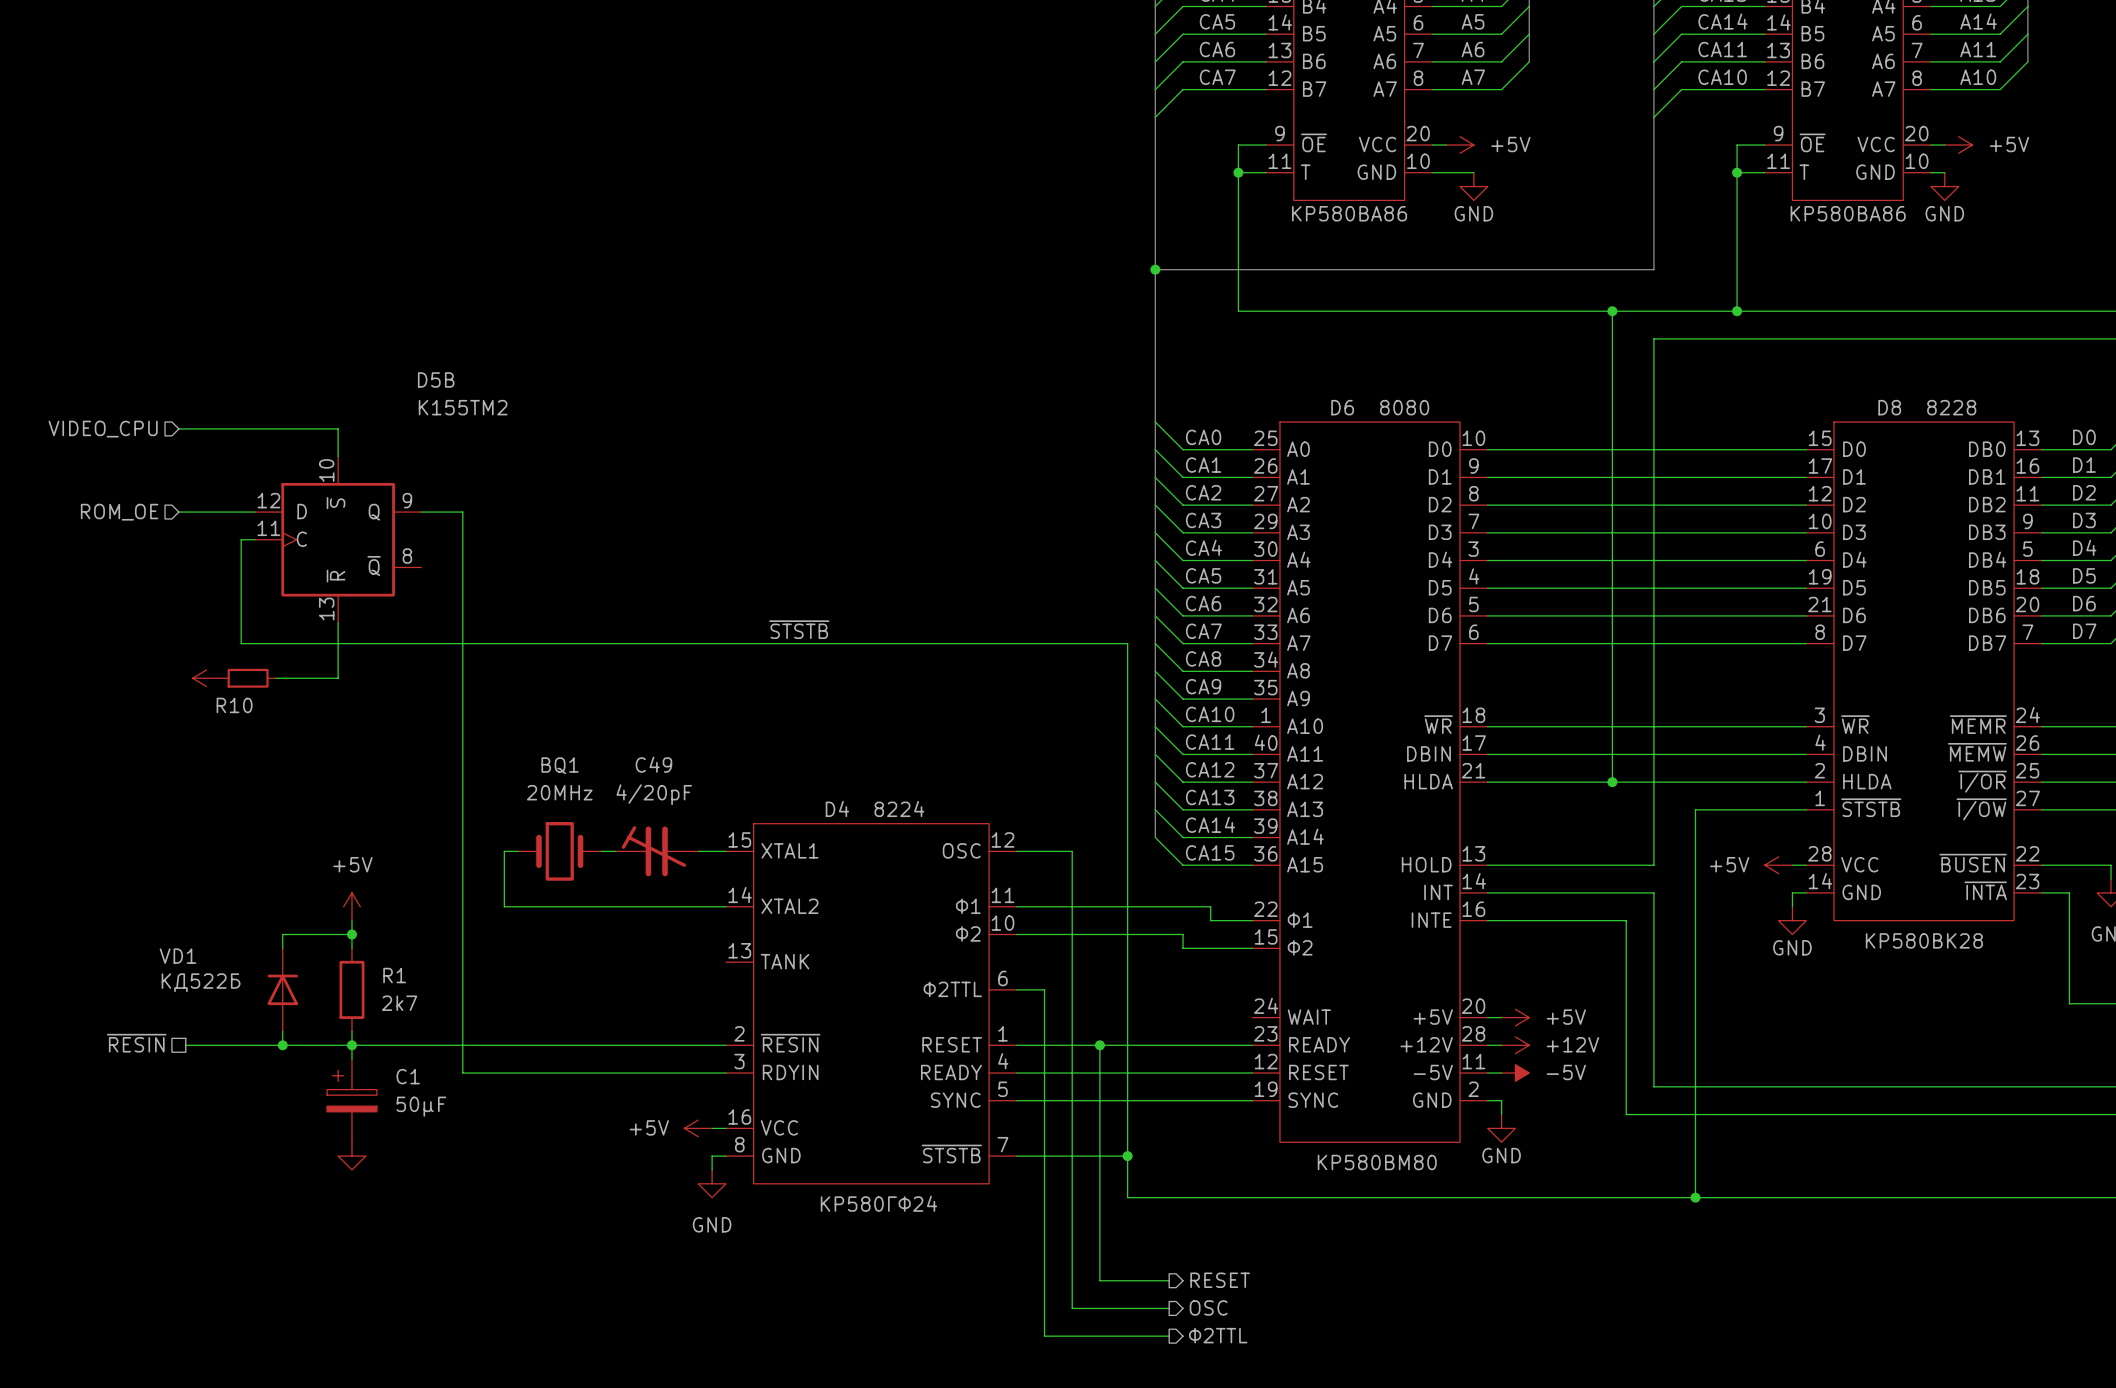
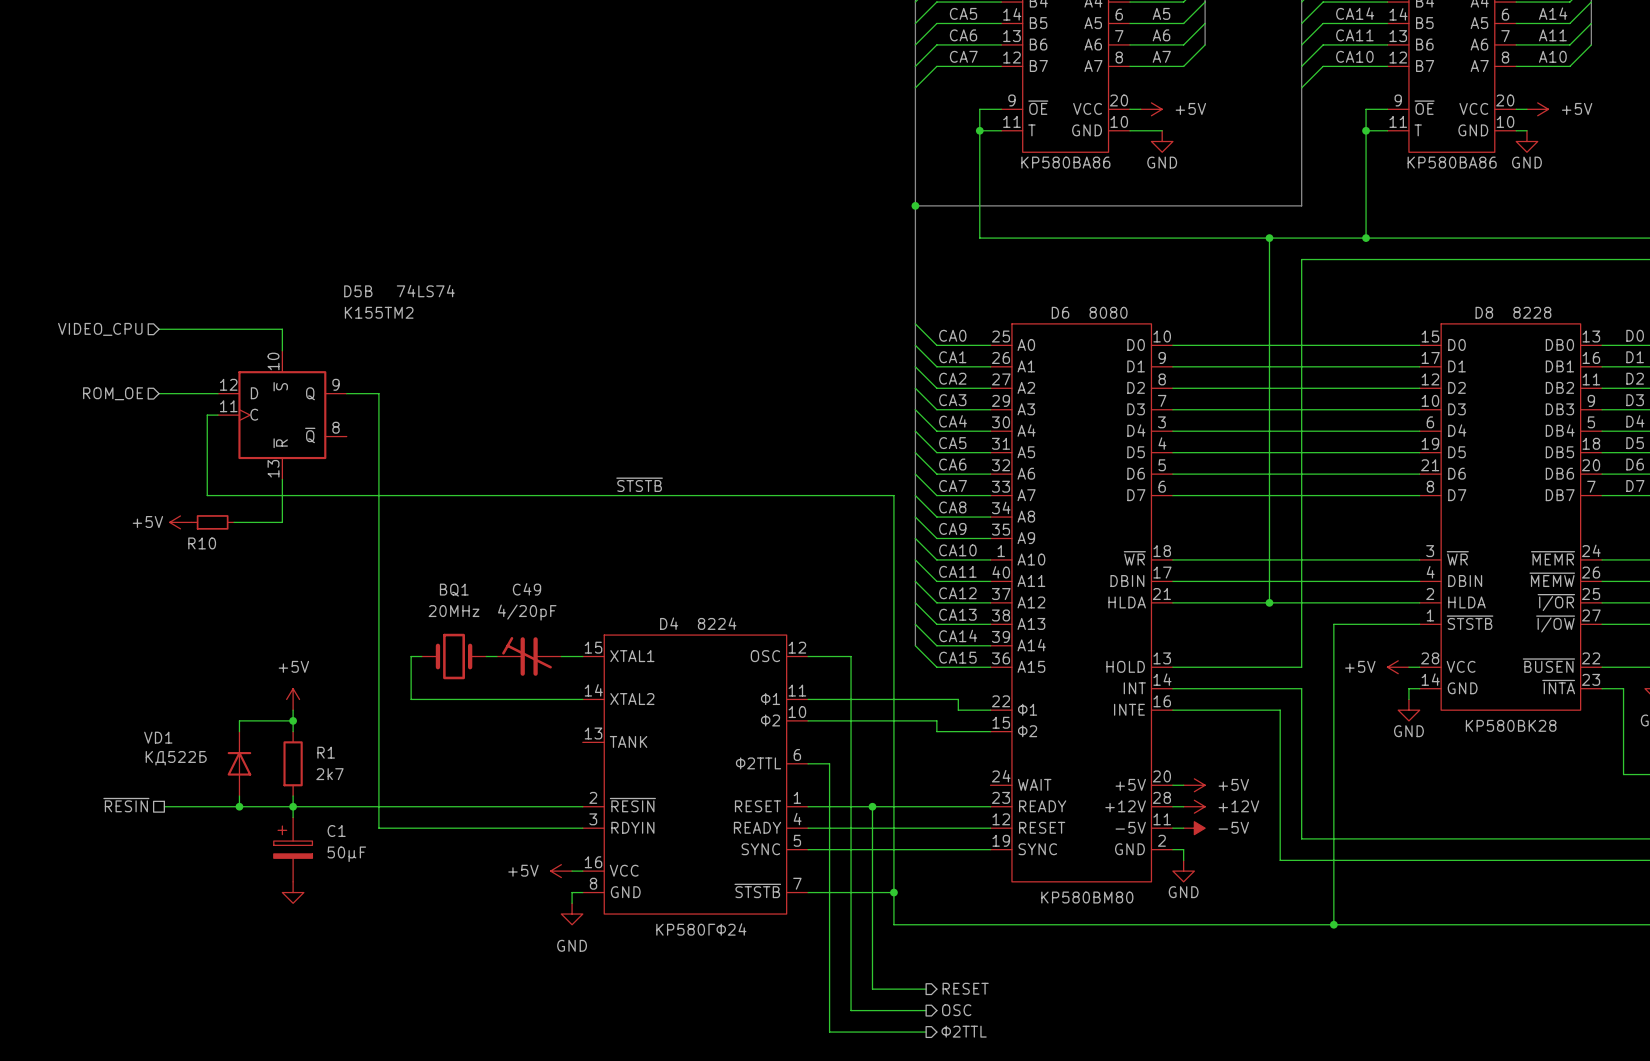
D5B value: none -> 74LS74 (425, 291)
power symbol text: none -> +5V (147, 522)

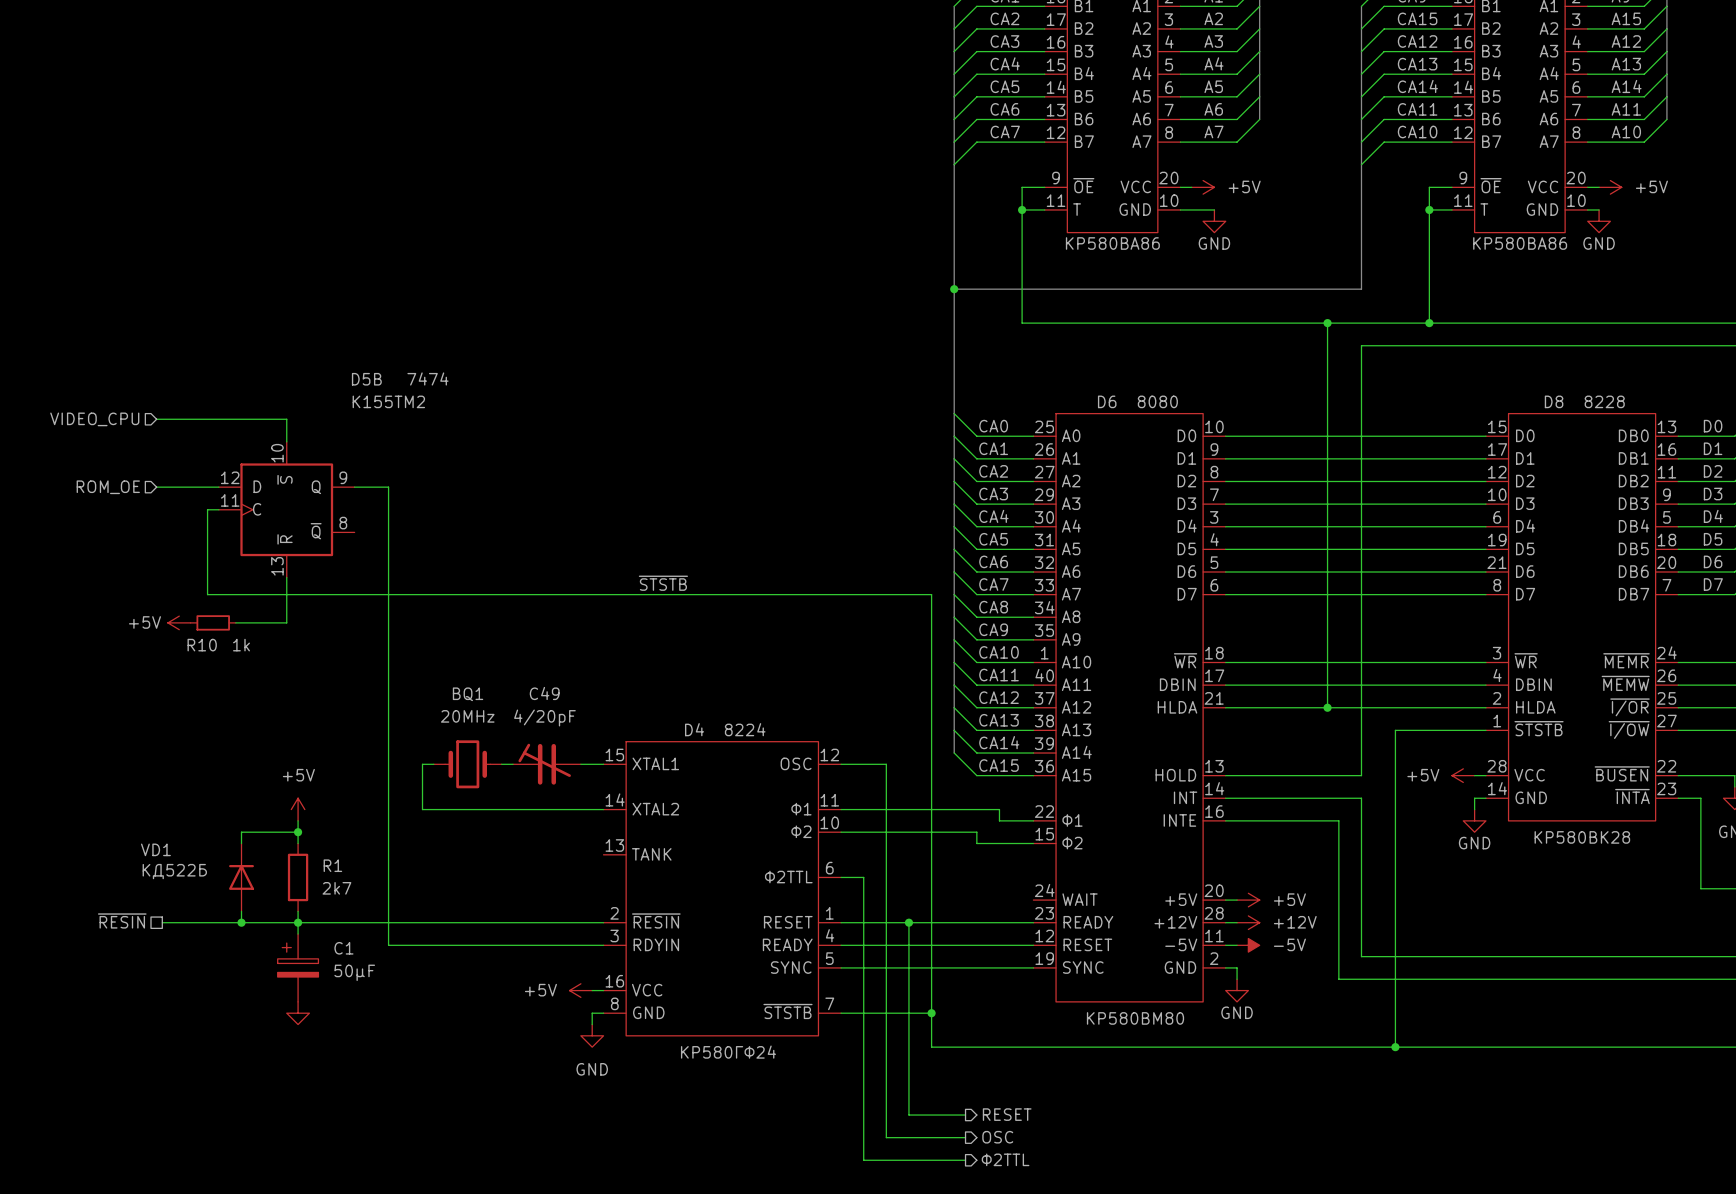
D5B value: 74LS74 (425, 291) -> 7474 (427, 378)
R10 value: none -> 1k (241, 645)

